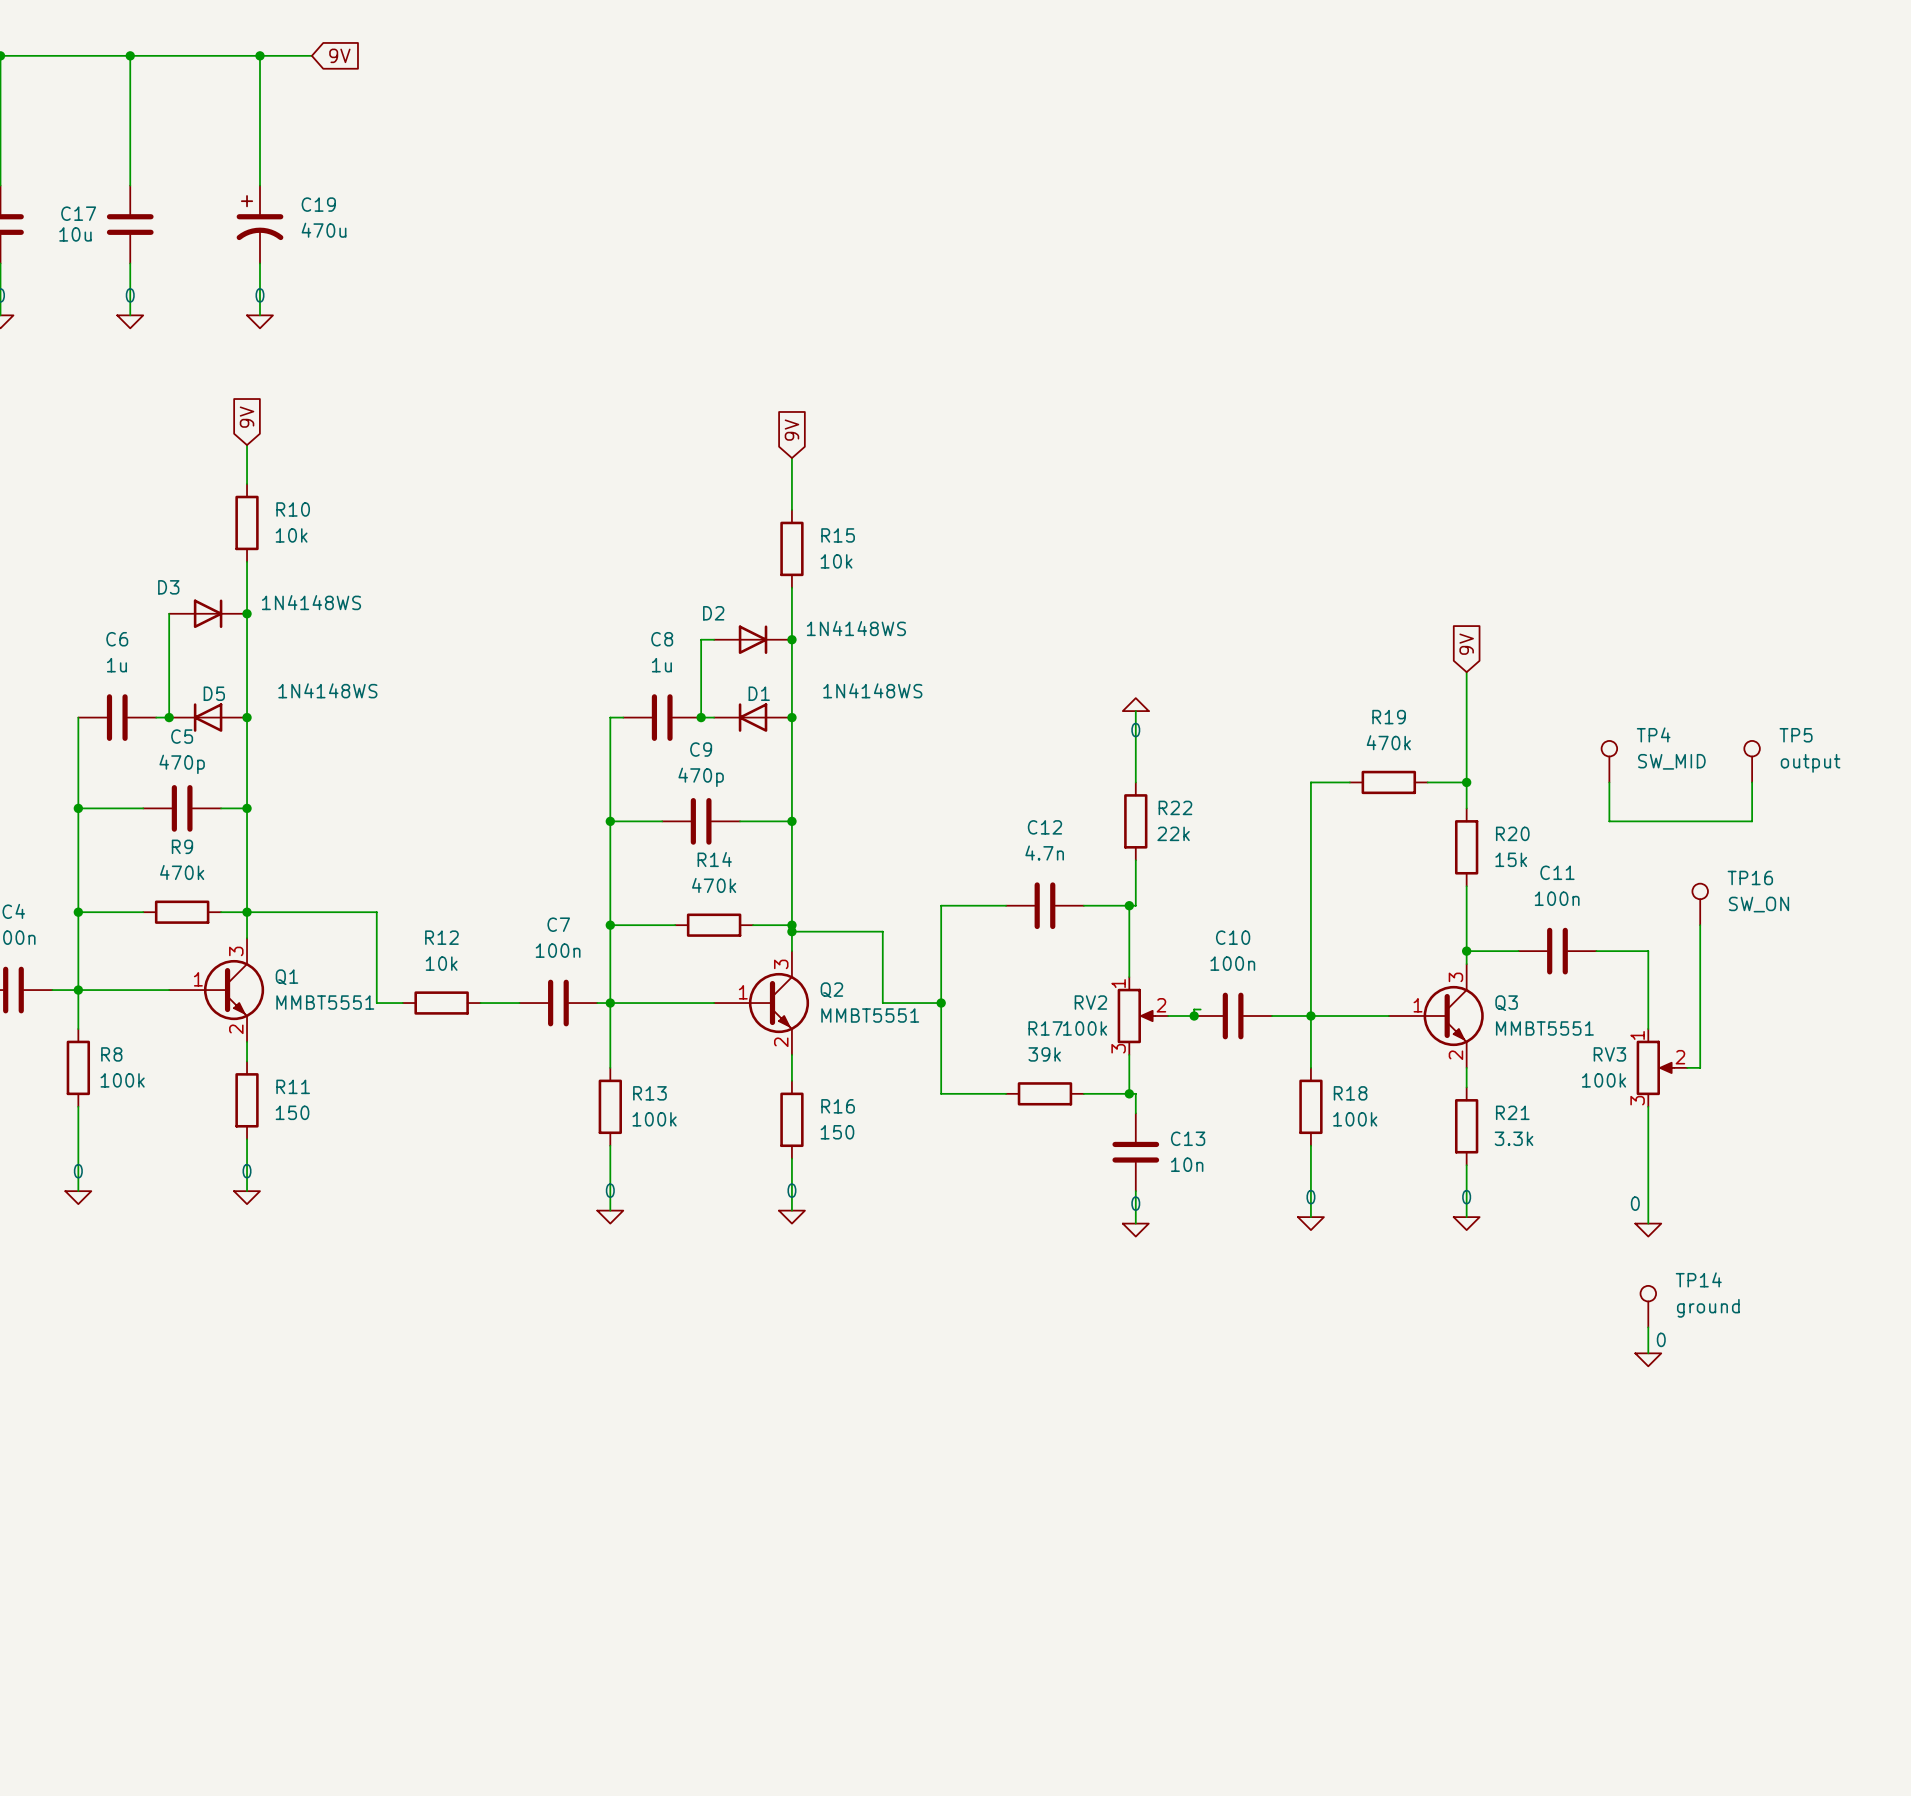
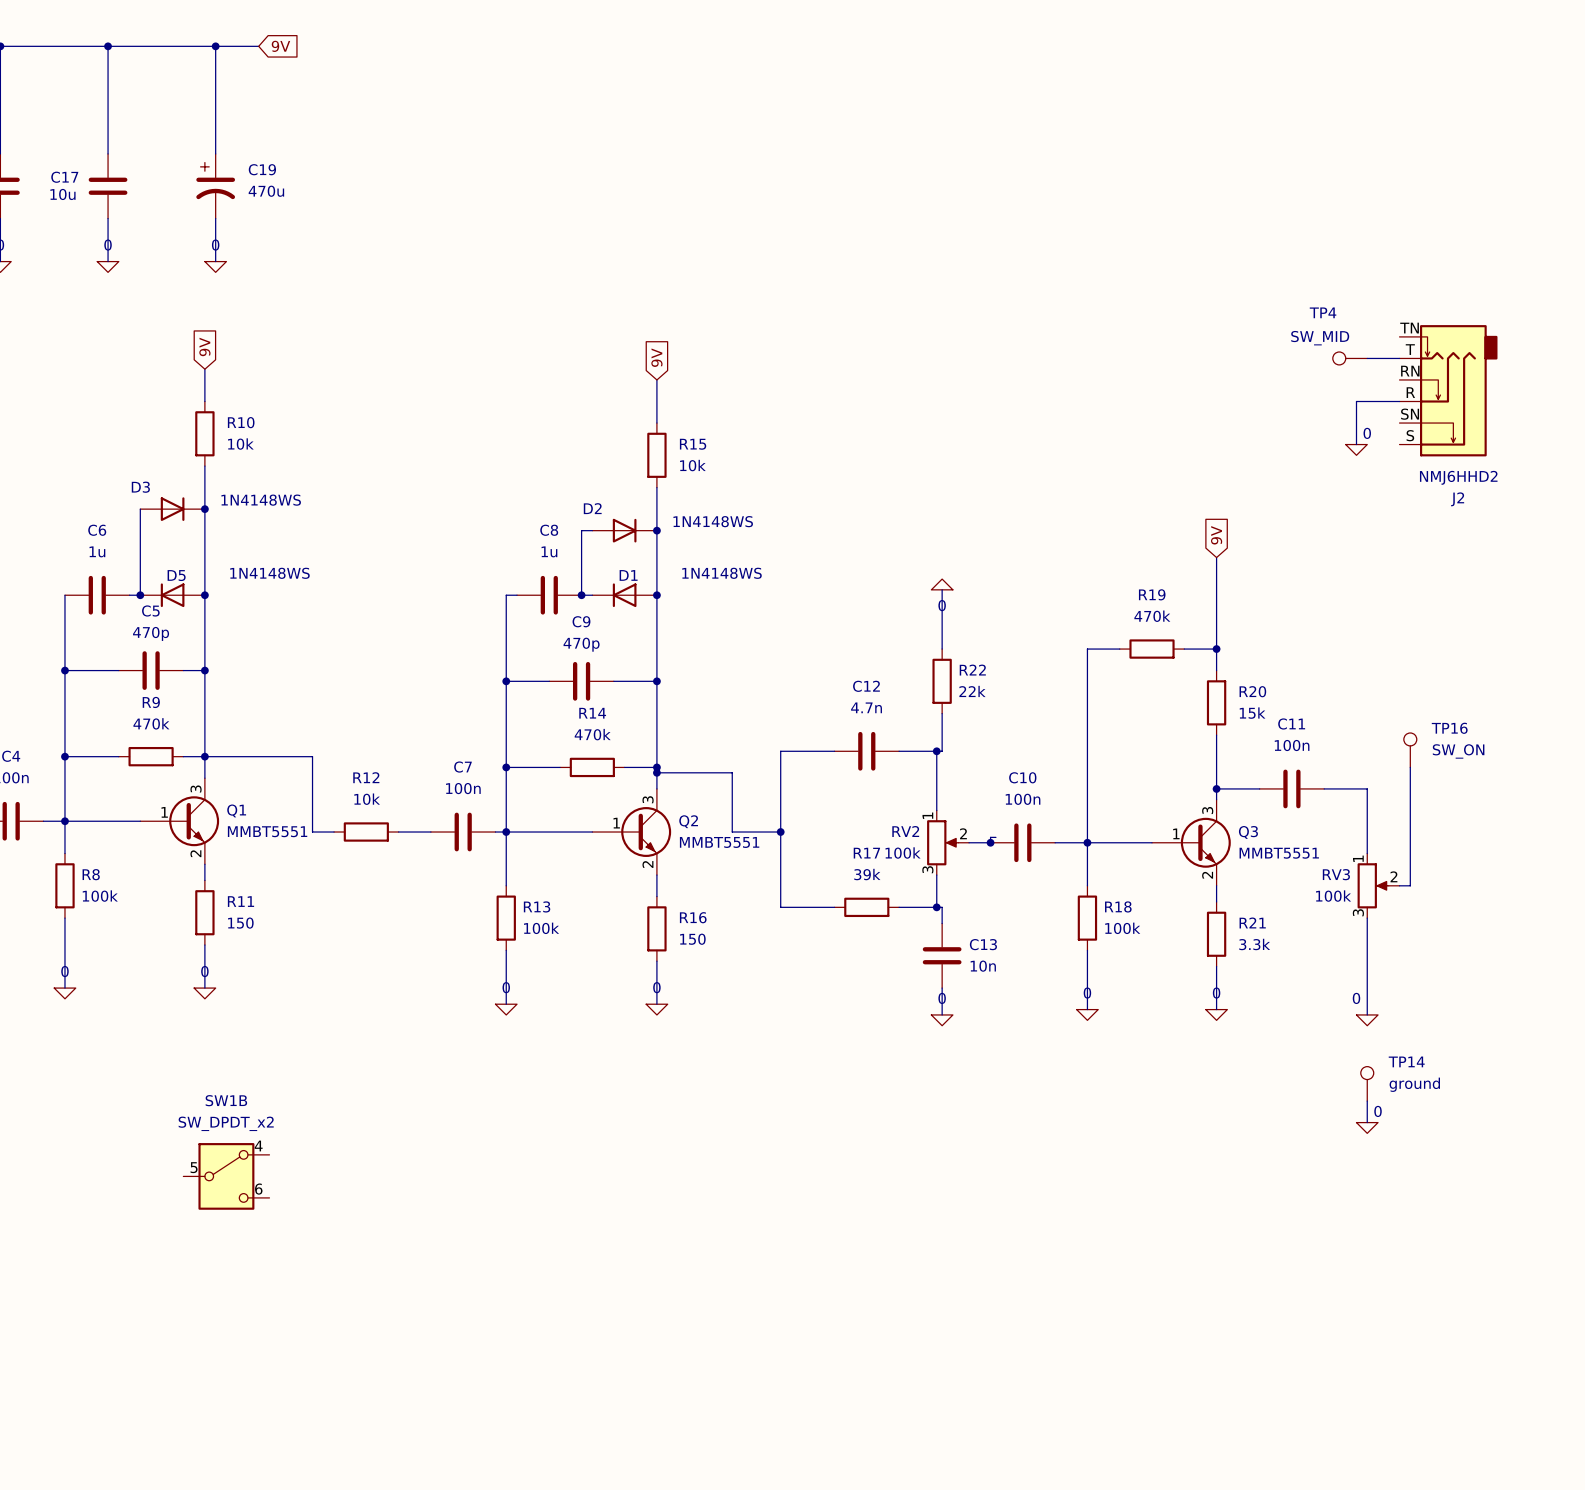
wire: none -> (1367, 358) (1399, 358)
J2: none -> NMJ6HHD2 (1448, 390)
wire: none -> (1399, 401) (1356, 401) (1356, 444)
power symbol: none -> 0 (1356, 449)
TP4 rotation: 0° (1609, 748) -> 90° counterclockwise (1339, 358)
TP4 position: (1609, 761) -> (1350, 358)
TP4 value position: SW_MID (1671, 761) -> SW_MID (1320, 338)
TP5: output (1752, 761) -> none
wire: (1609, 782) (1609, 821) (1752, 821) (1752, 782) -> none
SW1B: none -> SW_DPDT_x2 (226, 1176)

